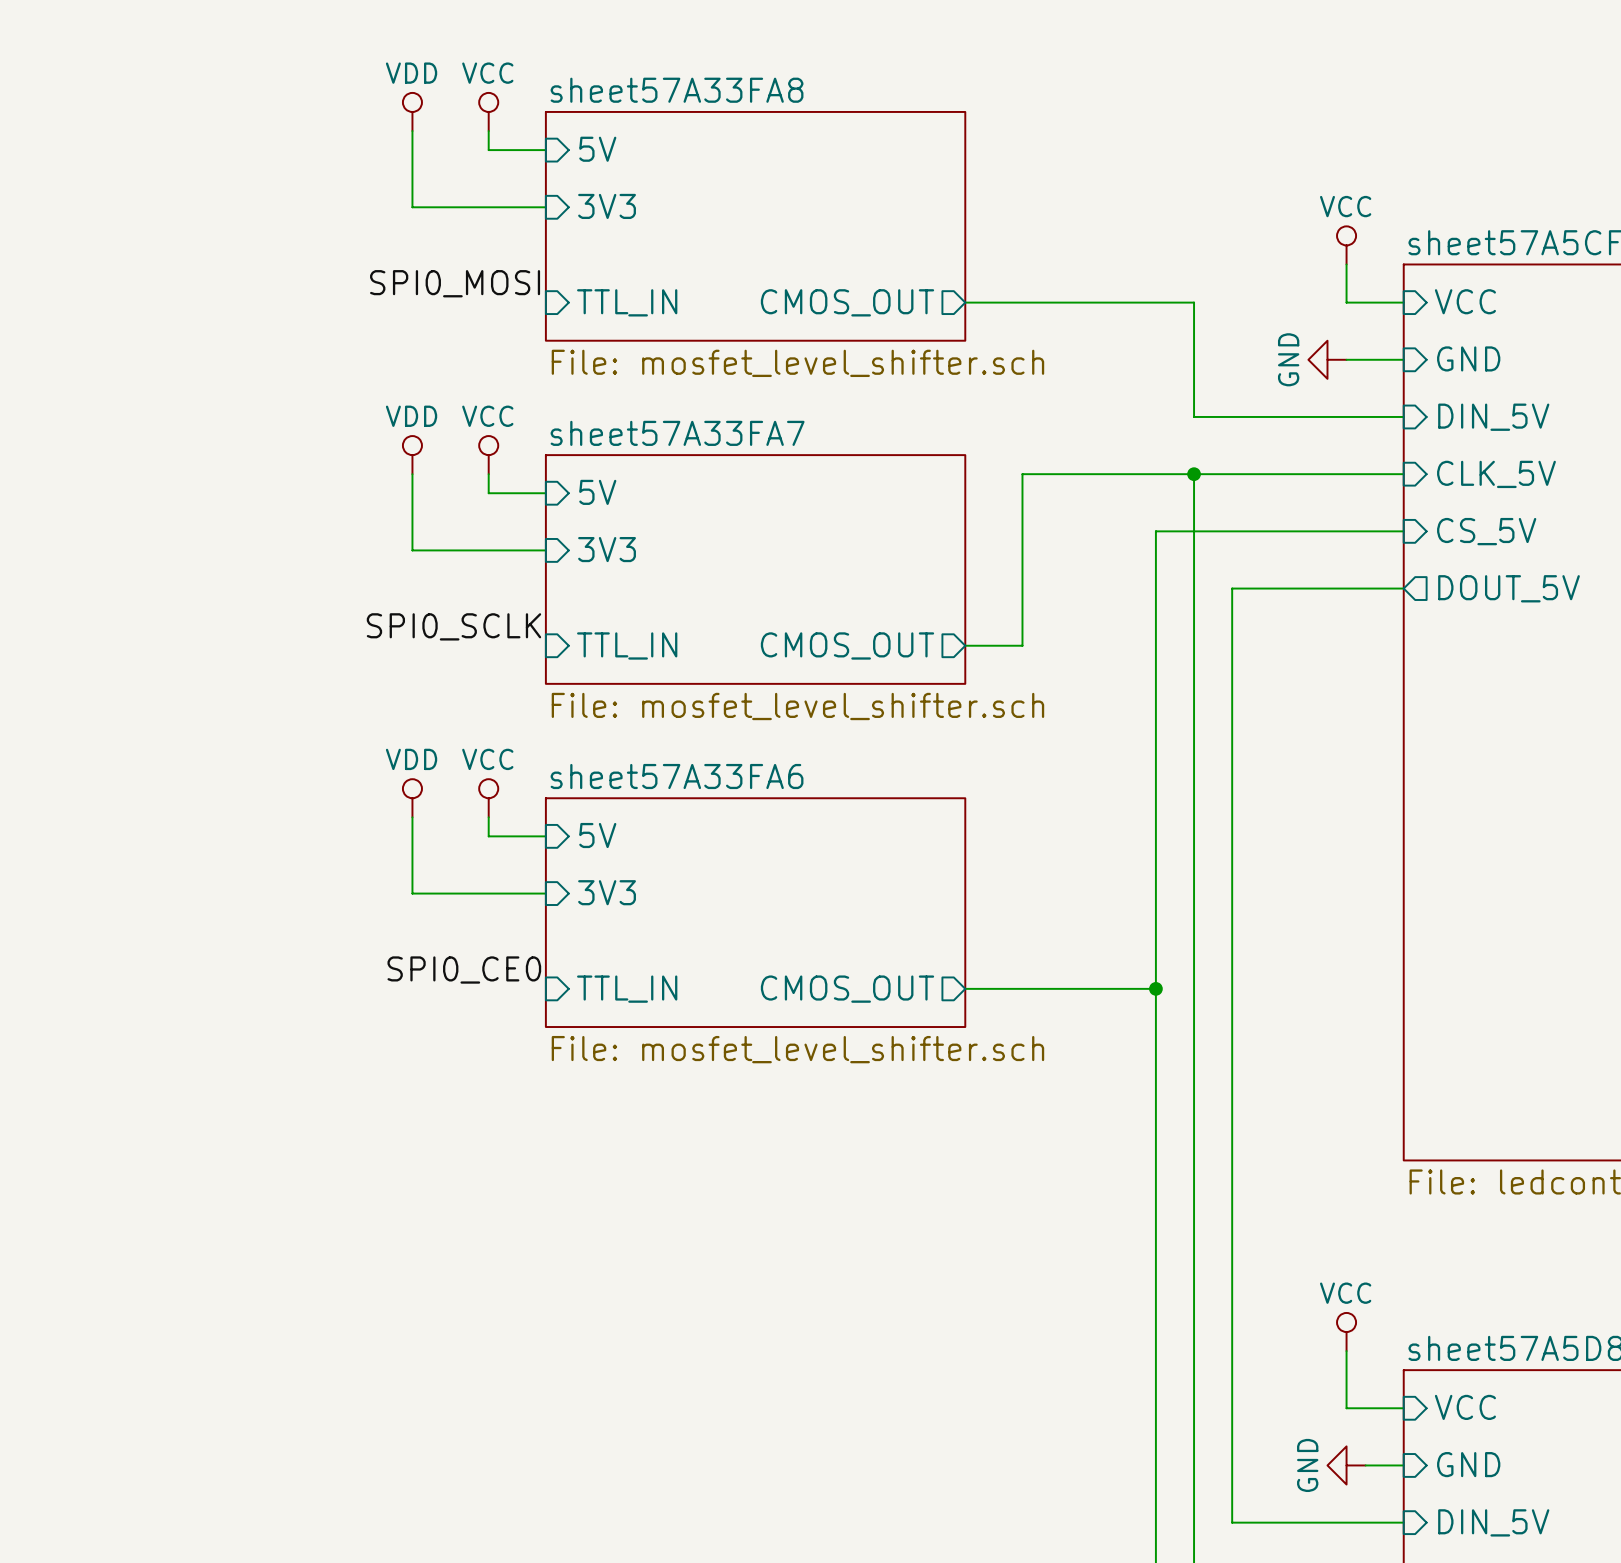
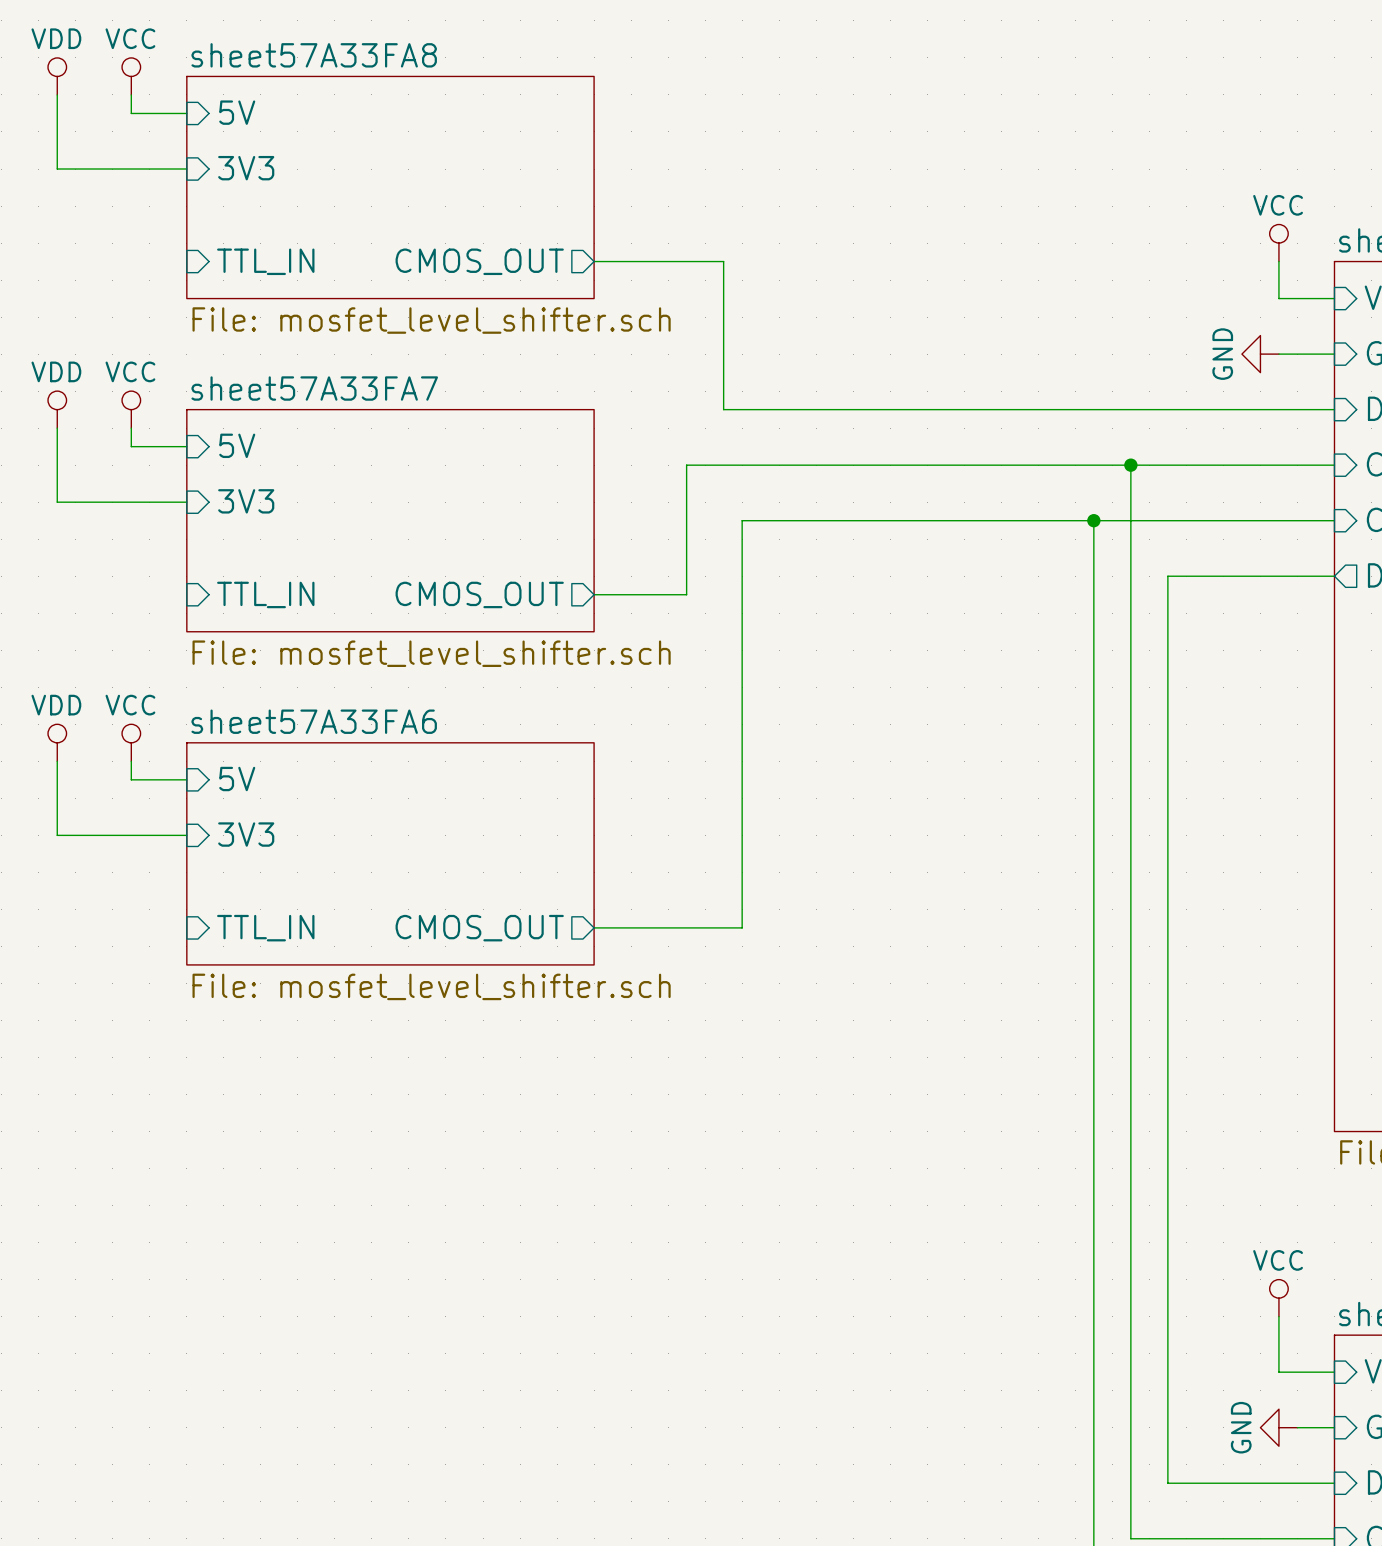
power symbol: none -> VDD (57, 76)
power symbol: none -> VCC (131, 76)
sheet pin: none -> 5V (237, 112)
power symbol: VDD (412, 111) -> none
power symbol: VCC (488, 111) -> none
wire: (412, 131) (412, 207) (545, 207) -> (57, 94) (57, 169) (186, 169)
wire: (488, 131) (488, 150) (545, 150) -> (131, 94) (131, 113) (186, 113)
sheet pin: 5V (597, 149) -> none
sheet pin: none -> 3V3 (246, 168)
sheet pin: 3V3 (607, 206) -> none
sheet sheet57A33FA8 position: (755, 226) -> (390, 187)
sheet pin: none -> TTL_IN (265, 261)
sheet pin: none -> CMOS_OUT (479, 261)
label: SPI0_MOSI (455, 283) -> none
sheet pin: TTL_IN (627, 302) -> none
sheet pin: CMOS_OUT (847, 302) -> none
wire: (965, 302) (1194, 302) (1194, 416) -> (594, 261) (723, 261) (723, 409) (1130, 409)
power symbol: none -> VDD (57, 409)
power symbol: none -> VCC (131, 409)
sheet pin: none -> 5V (237, 445)
power symbol: VDD (412, 455) -> none
power symbol: VCC (488, 455) -> none
wire: (412, 474) (412, 550) (545, 550) -> (57, 428) (57, 502) (186, 502)
wire: (488, 474) (488, 493) (545, 493) -> (131, 428) (131, 446) (186, 446)
wire: (1022, 474) (1022, 645) (965, 645) -> (964, 465) (686, 465) (686, 594) (594, 594)
sheet pin: 5V (597, 492) -> none
sheet pin: none -> 3V3 (246, 501)
wire: none -> (1093, 520) (742, 520) (742, 927) (594, 927)
junction: none -> (1093, 520)
sheet pin: 3V3 (607, 549) -> none
sheet sheet57A33FA7 position: (755, 569) -> (390, 520)
sheet pin: none -> TTL_IN (265, 594)
sheet pin: none -> CMOS_OUT (479, 594)
label: SPI0_SCLK (453, 626) -> none
sheet pin: TTL_IN (627, 645) -> none
sheet pin: CMOS_OUT (847, 645) -> none
power symbol: none -> VDD (57, 742)
power symbol: none -> VCC (131, 742)
sheet pin: none -> 5V (237, 779)
power symbol: VDD (412, 798) -> none
power symbol: VCC (488, 798) -> none
wire: (412, 817) (412, 893) (545, 893) -> (57, 761) (57, 835) (186, 835)
wire: (488, 817) (488, 836) (545, 836) -> (131, 761) (131, 779) (186, 779)
sheet pin: 5V (597, 835) -> none
sheet pin: none -> 3V3 (246, 834)
sheet pin: 3V3 (607, 892) -> none
sheet sheet57A33FA6 position: (755, 912) -> (390, 853)
sheet pin: none -> TTL_IN (265, 928)
sheet pin: none -> CMOS_OUT (479, 928)
label: SPI0_CE0 (464, 970) -> none
wire: (965, 988) (1155, 988) -> none
junction: (1155, 988) -> none
sheet pin: TTL_IN (627, 989) -> none
sheet pin: CMOS_OUT (847, 989) -> none

